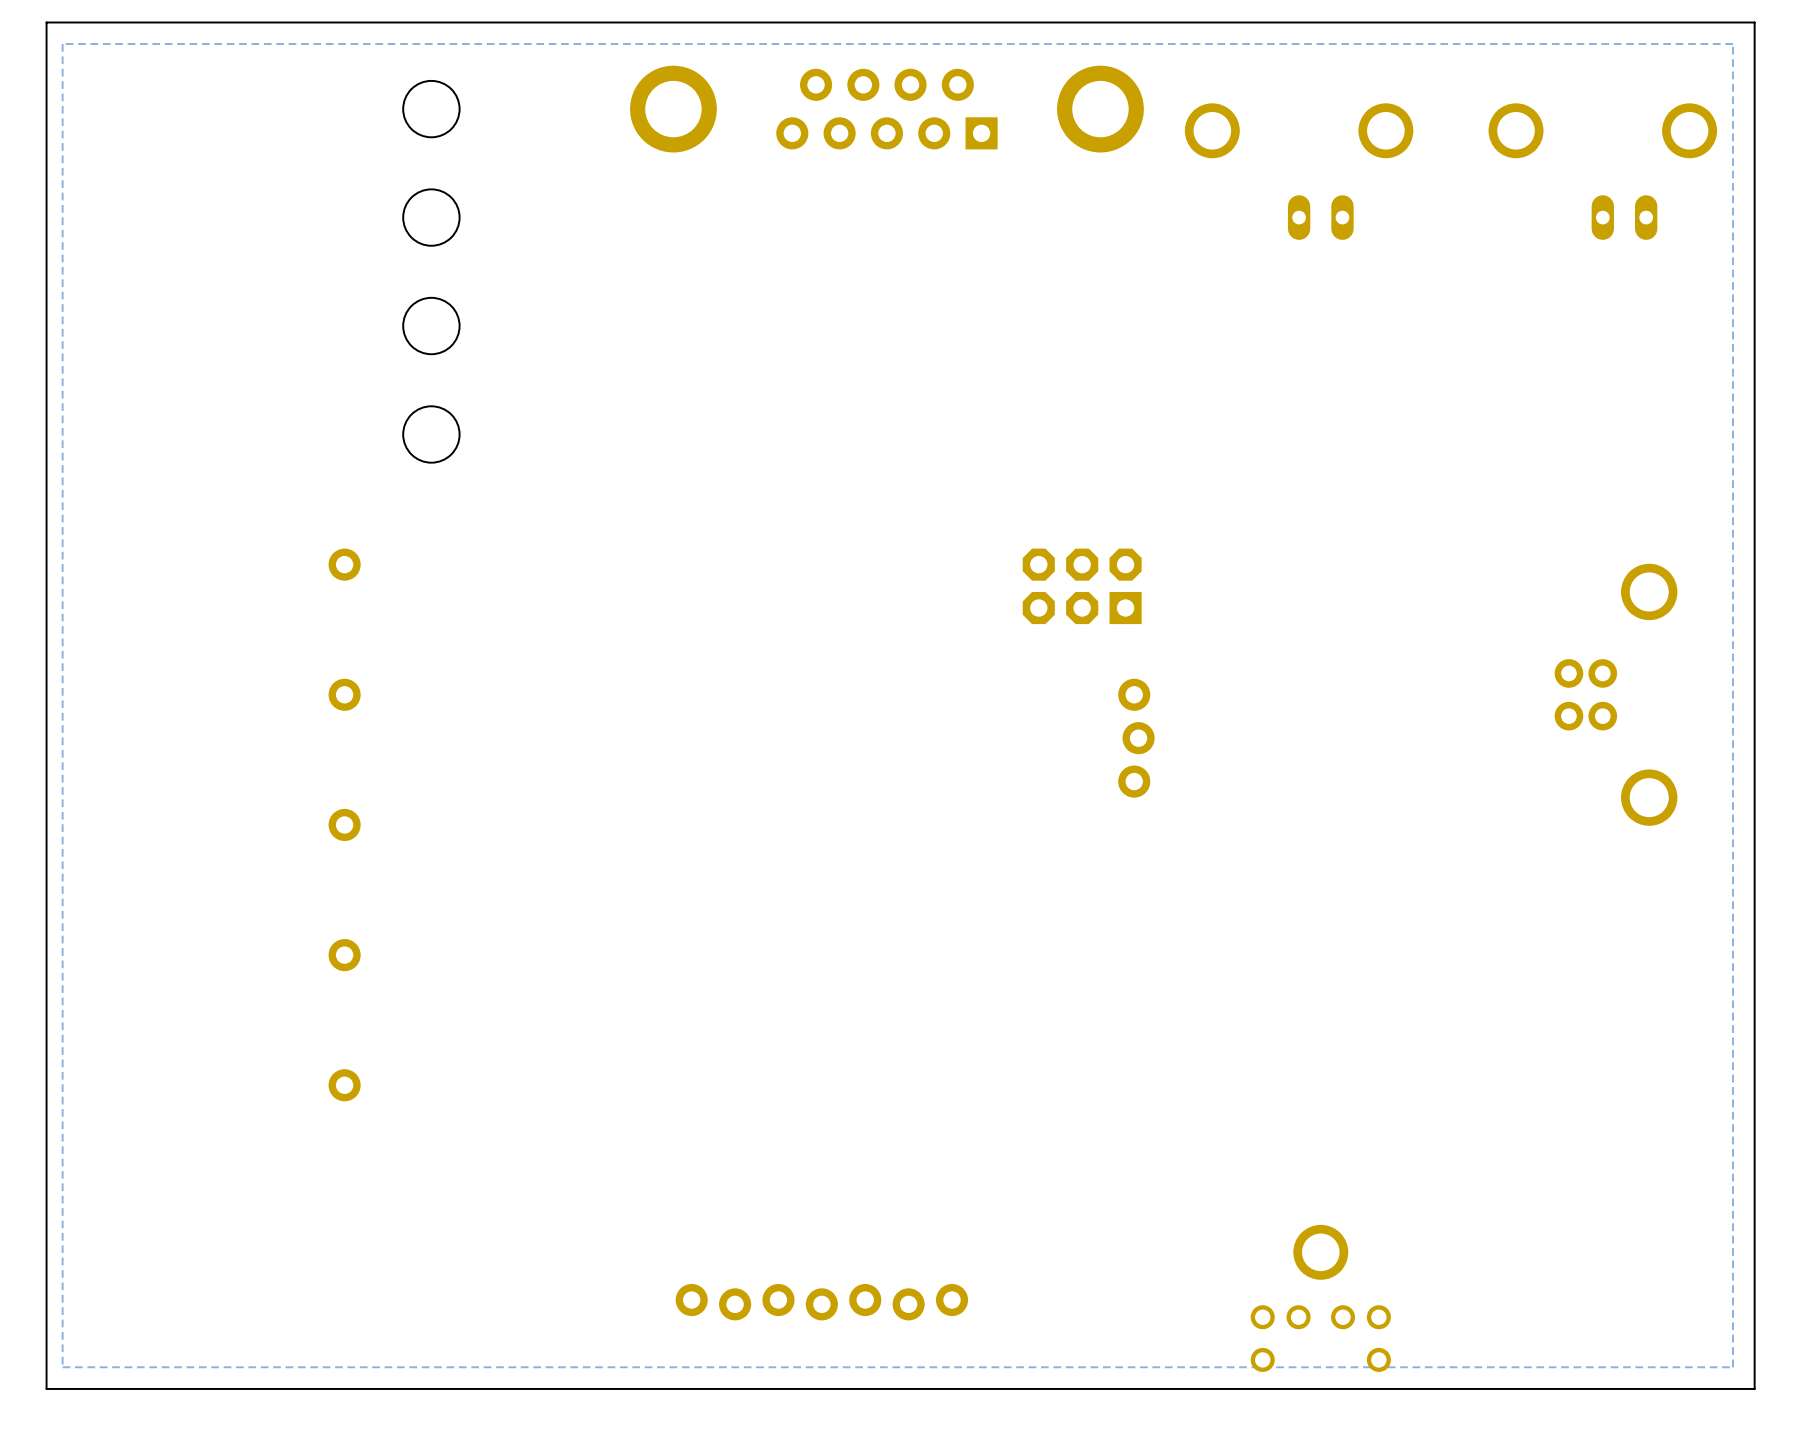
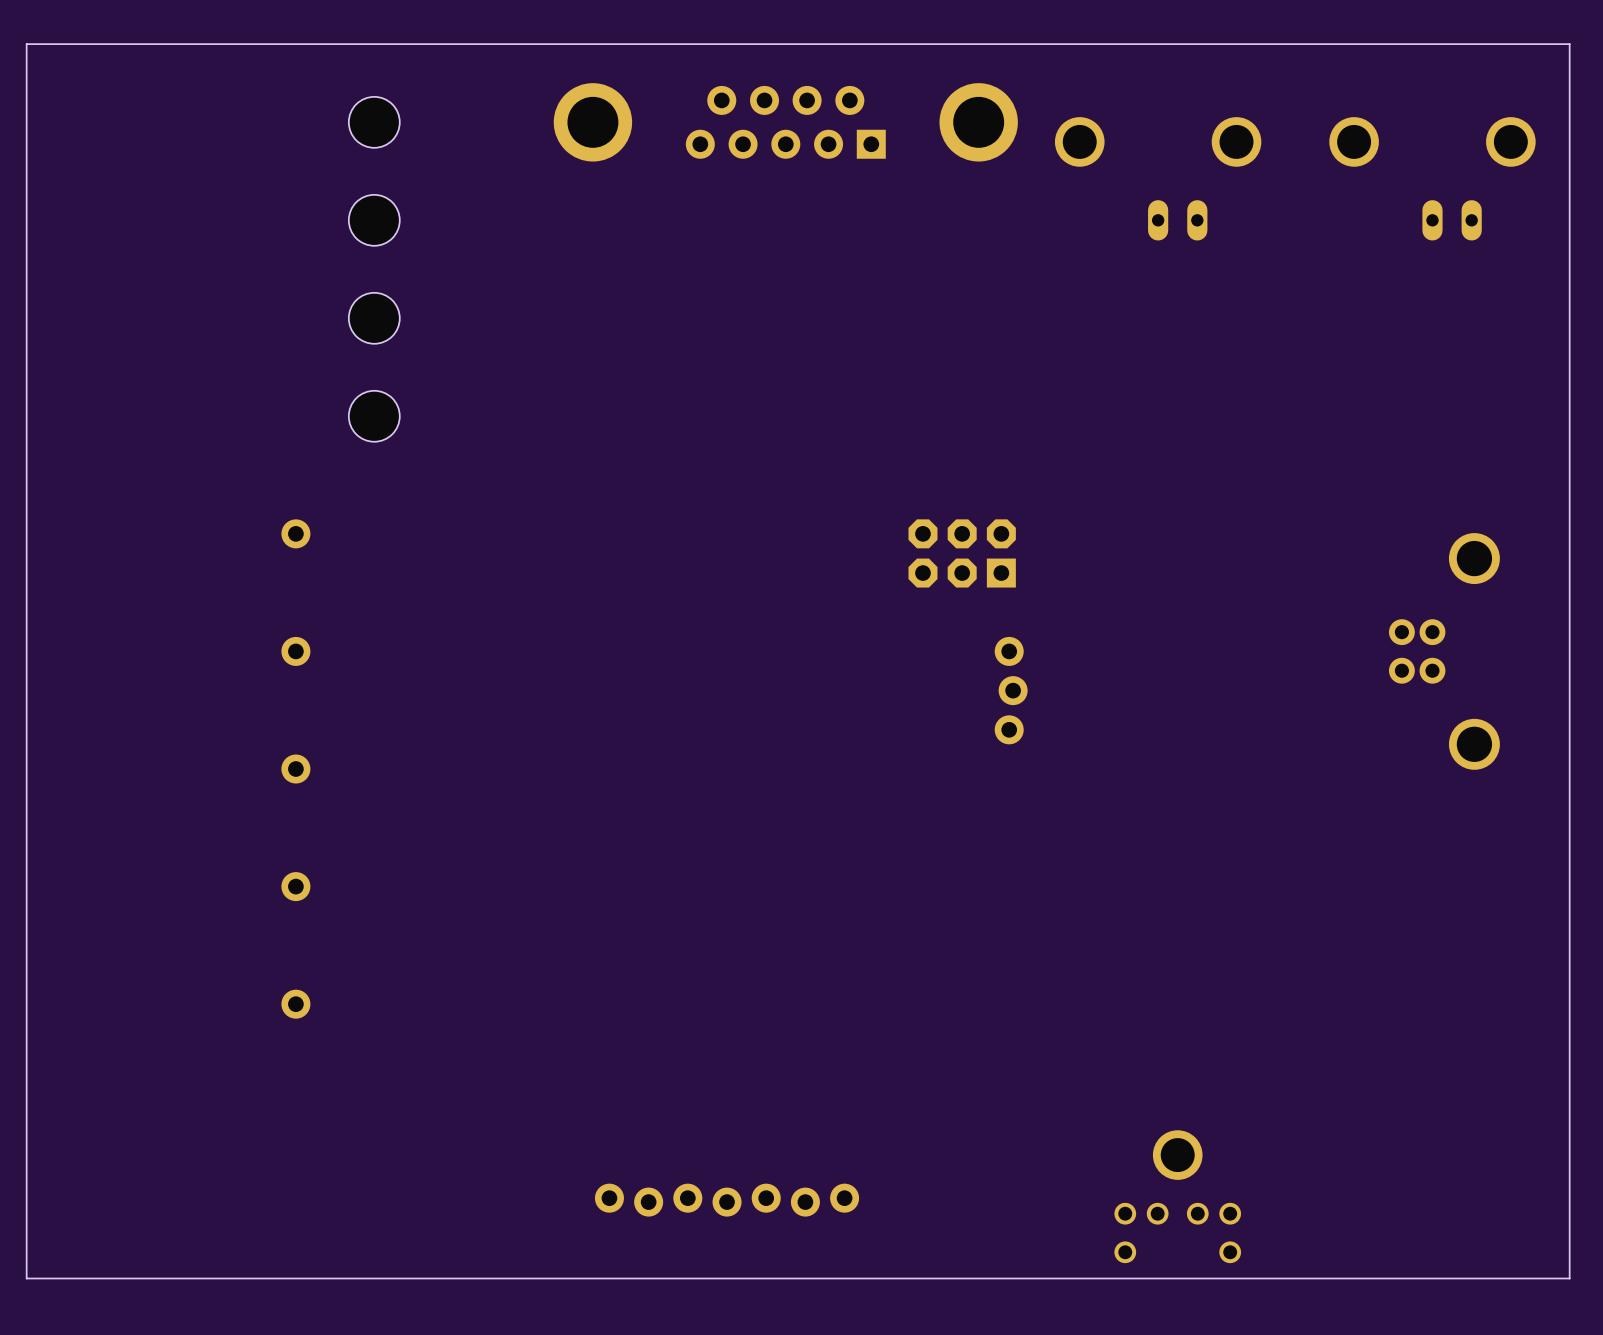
zone outline: (1732, 44) (62, 44) (62, 1367) (1732, 1367) (1732, 44) -> none

